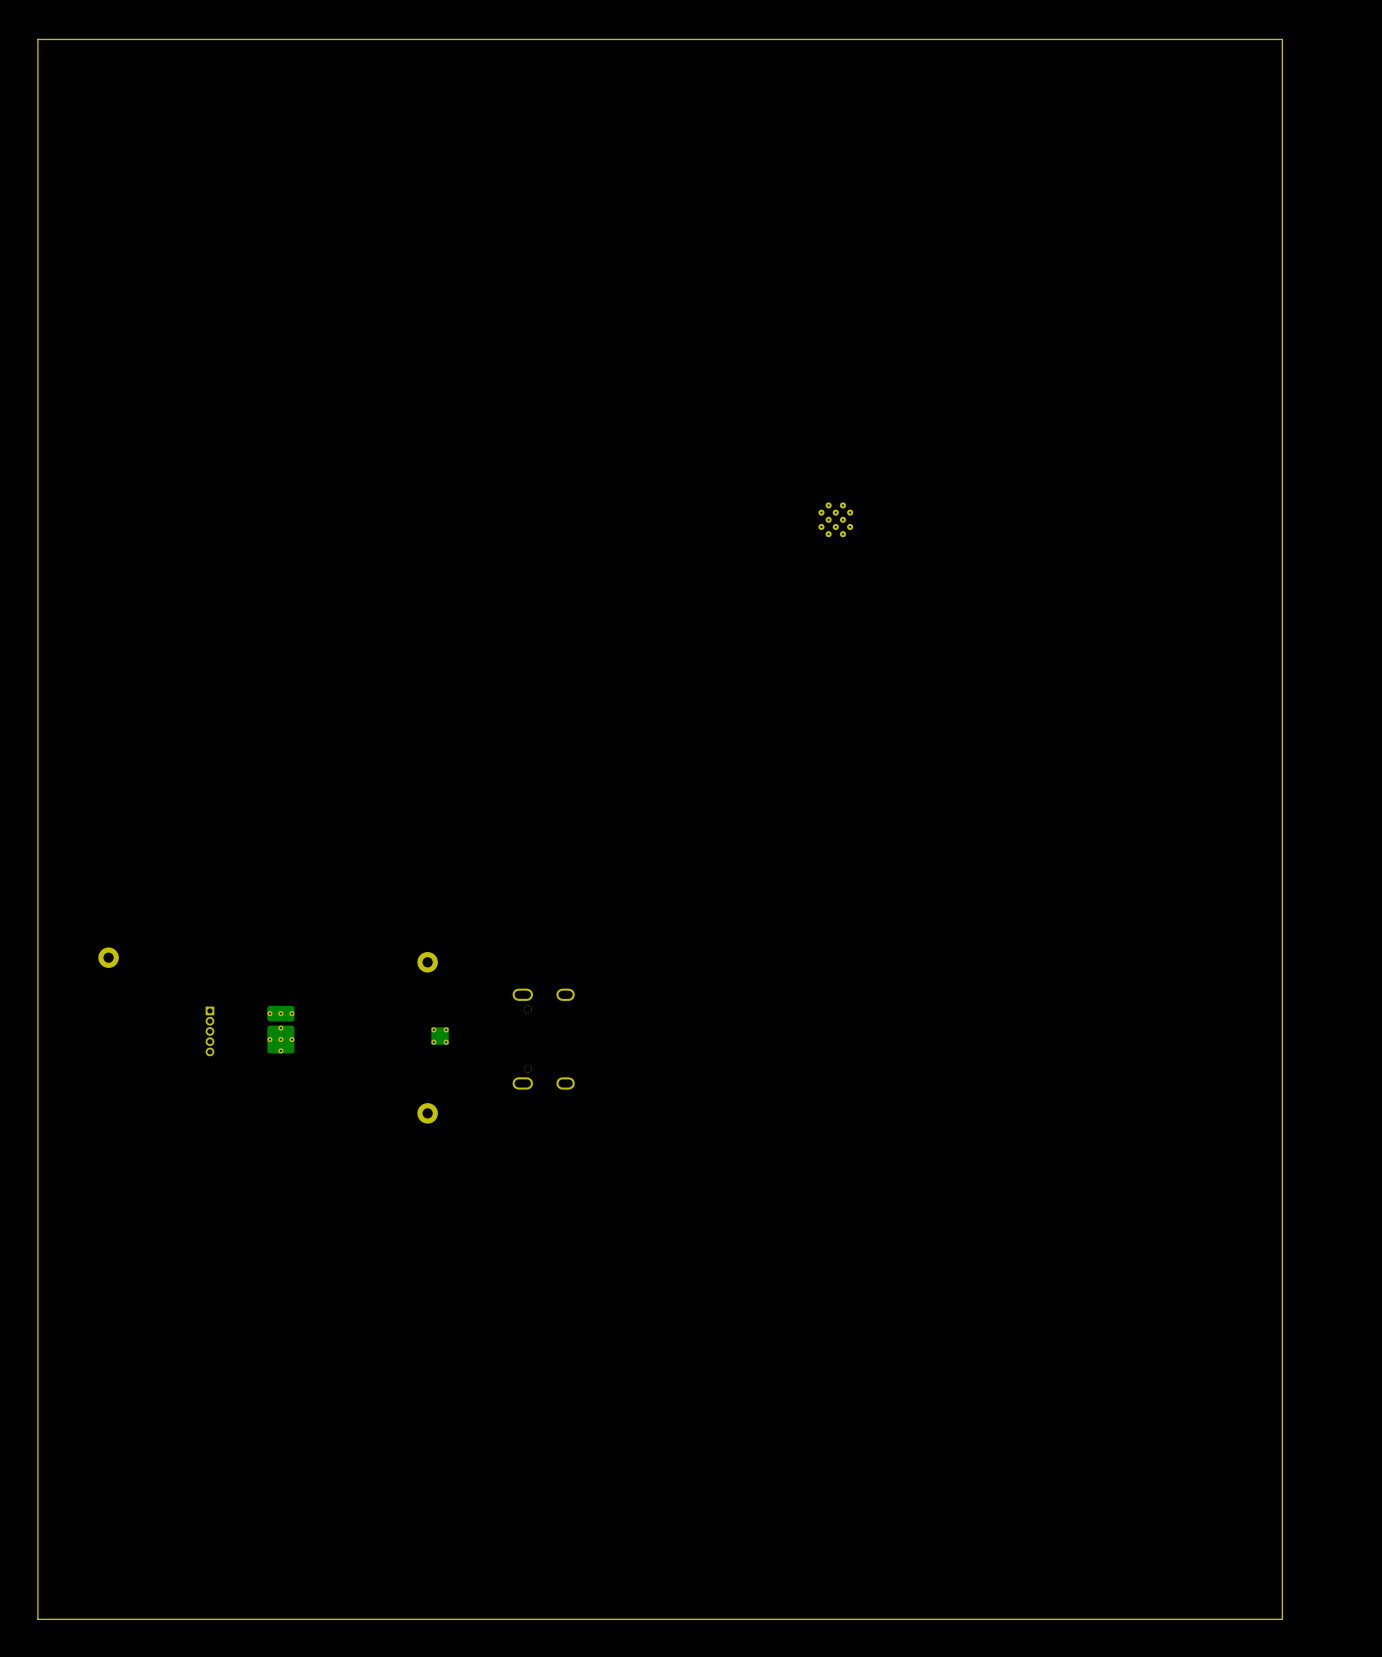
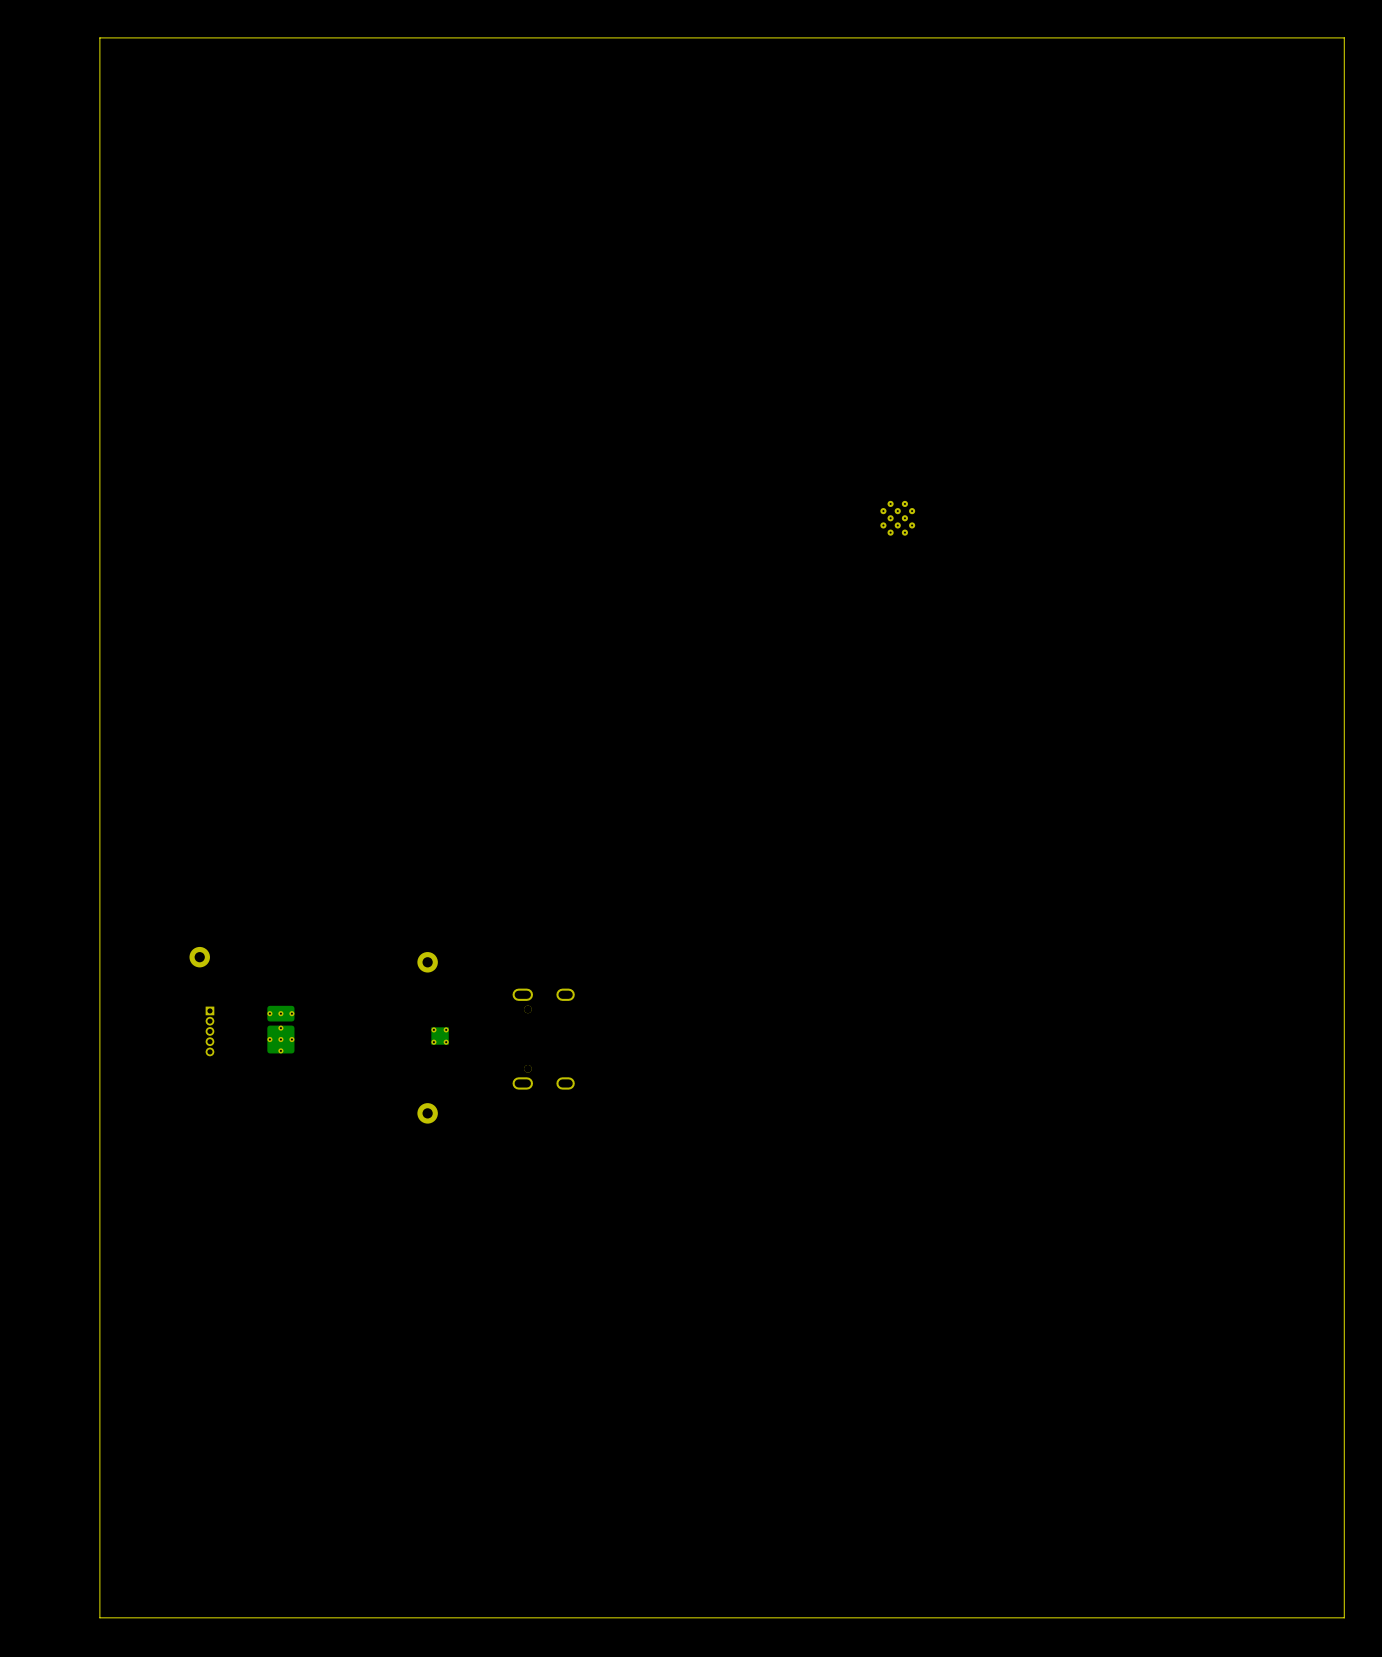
board edge: (1282, 39) (37, 39) (37, 1619) (1282, 1619) (1282, 39) -> (1344, 37) (99, 37) (99, 1617) (1344, 1617) (1344, 37)
part position: (835, 519) -> (897, 518)
part position: (108, 957) -> (199, 957)

